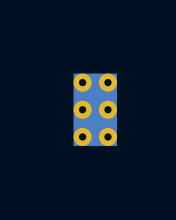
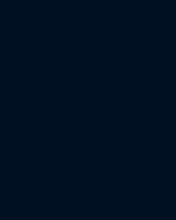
part: (95, 109) -> none

